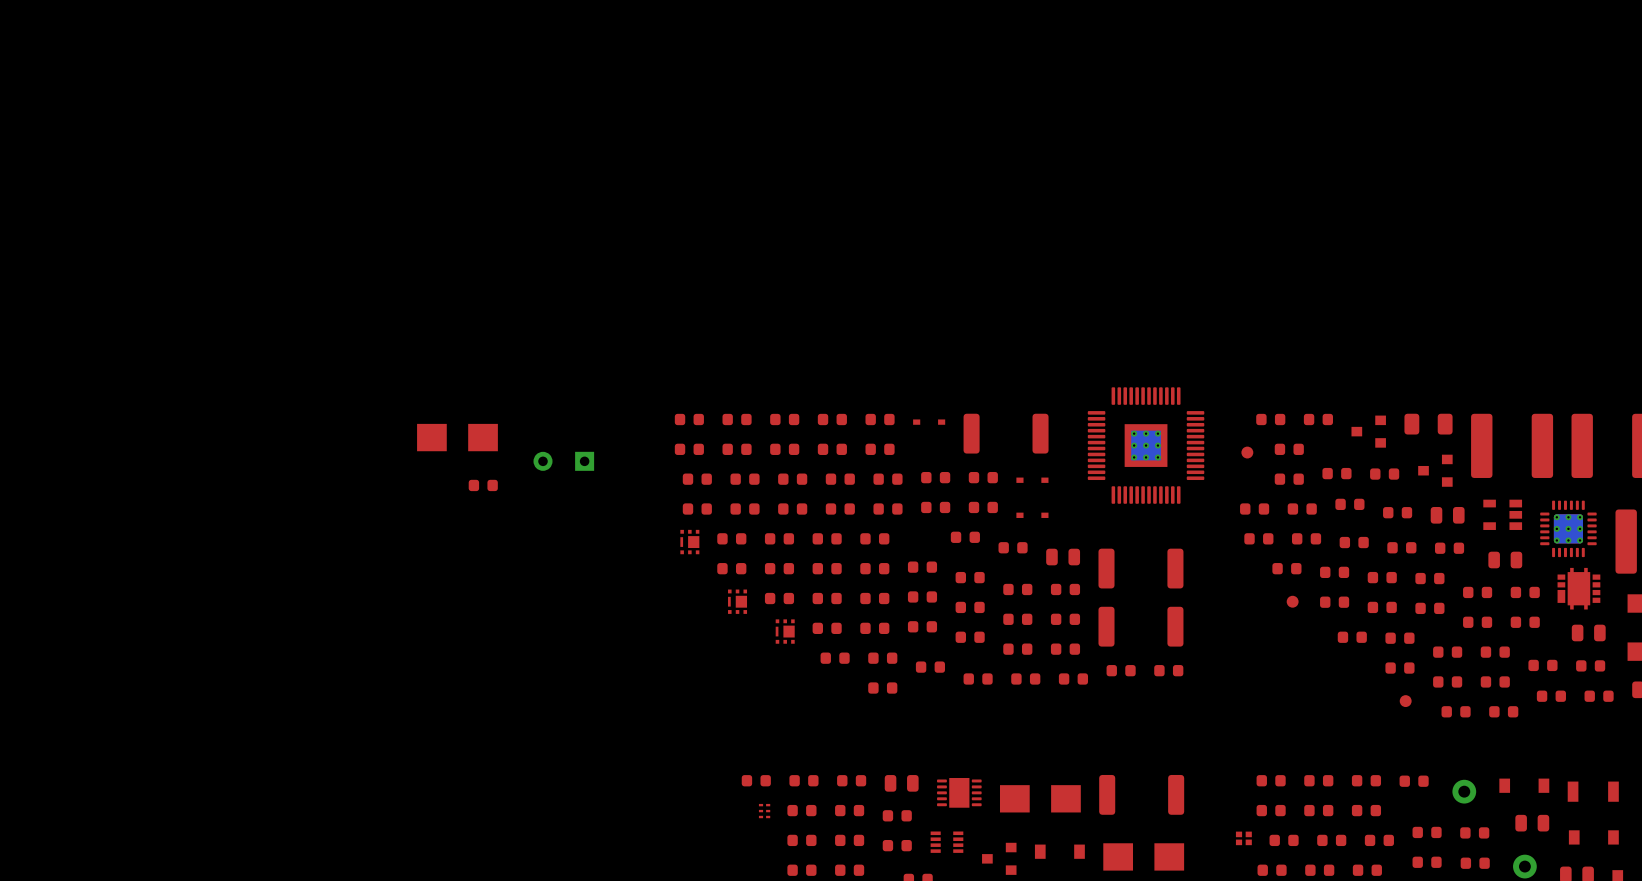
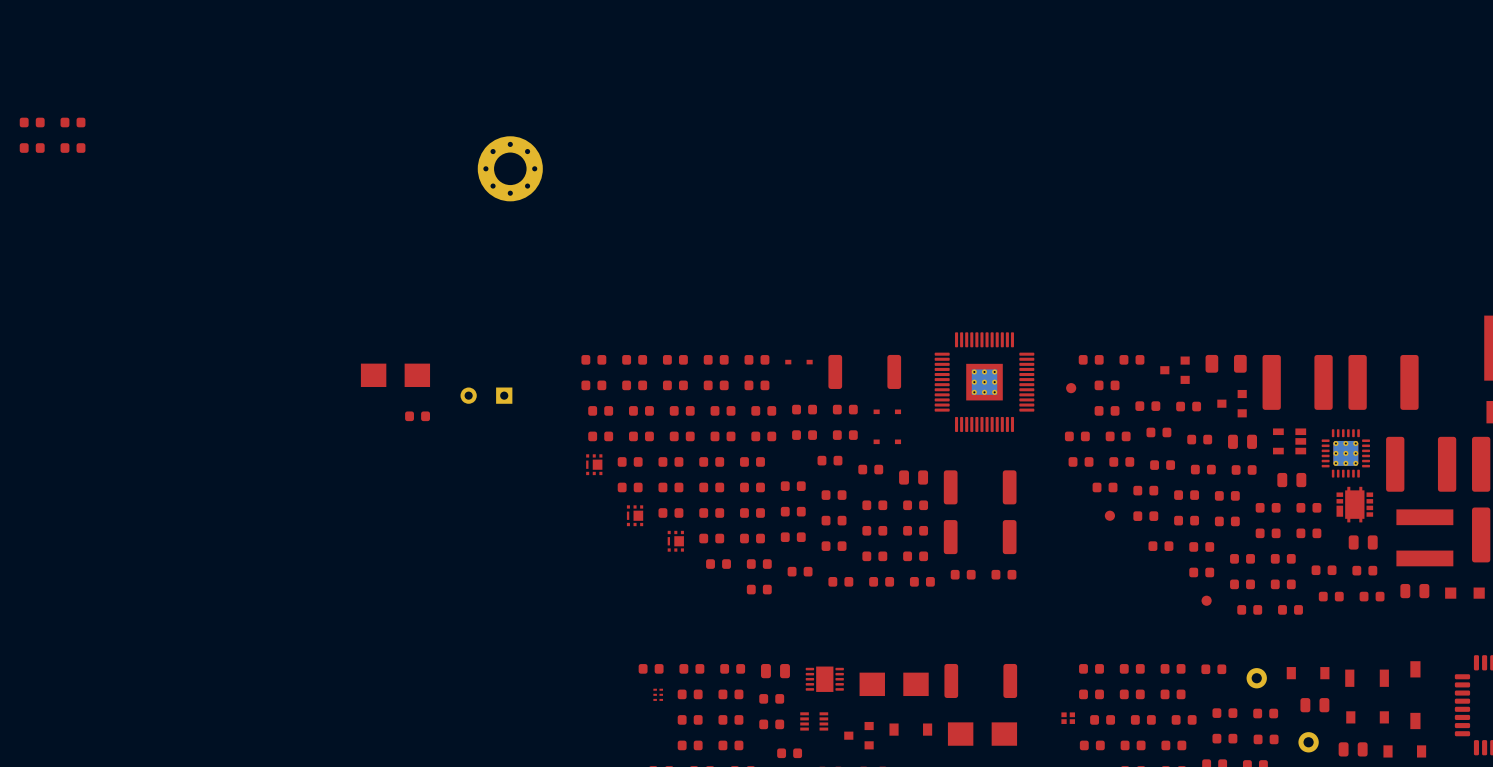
part: none -> (32, 122)
part: none -> (72, 122)
part: none -> (32, 148)
part: none -> (72, 148)
part: none -> (510, 168)

